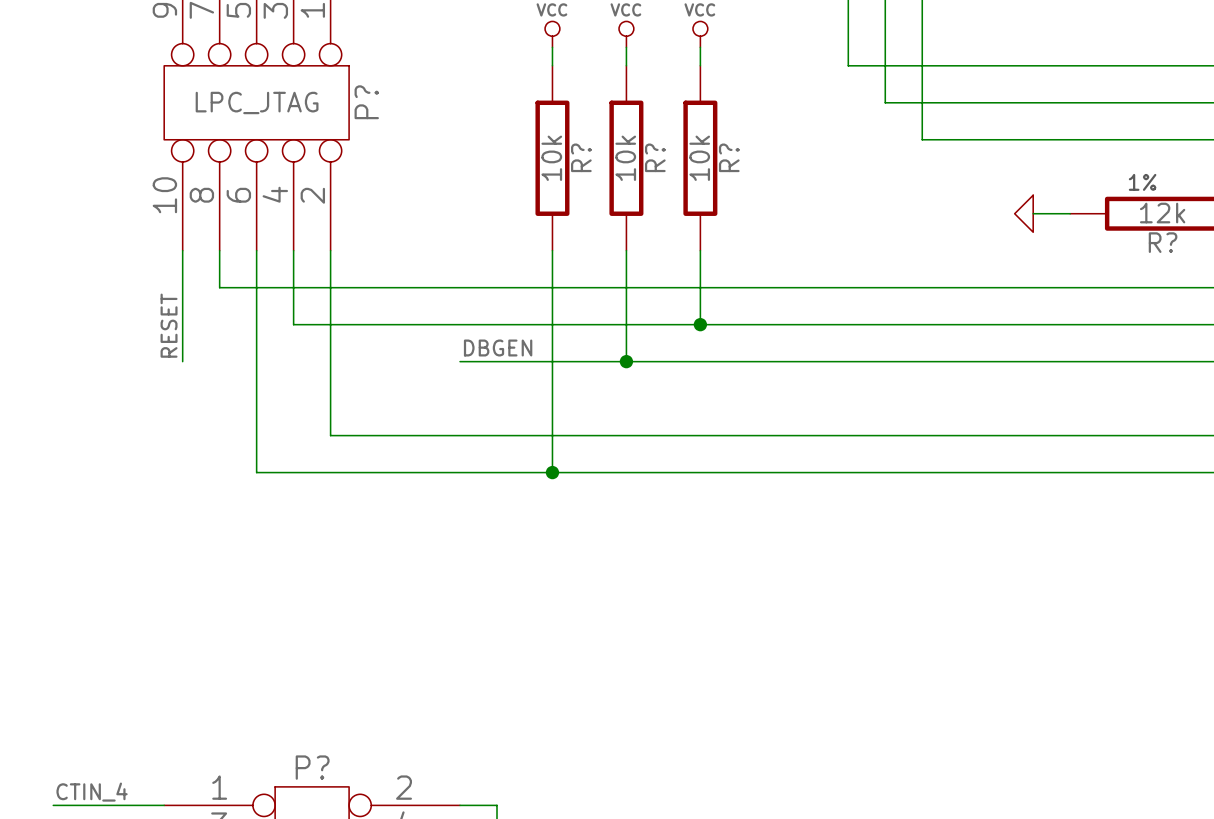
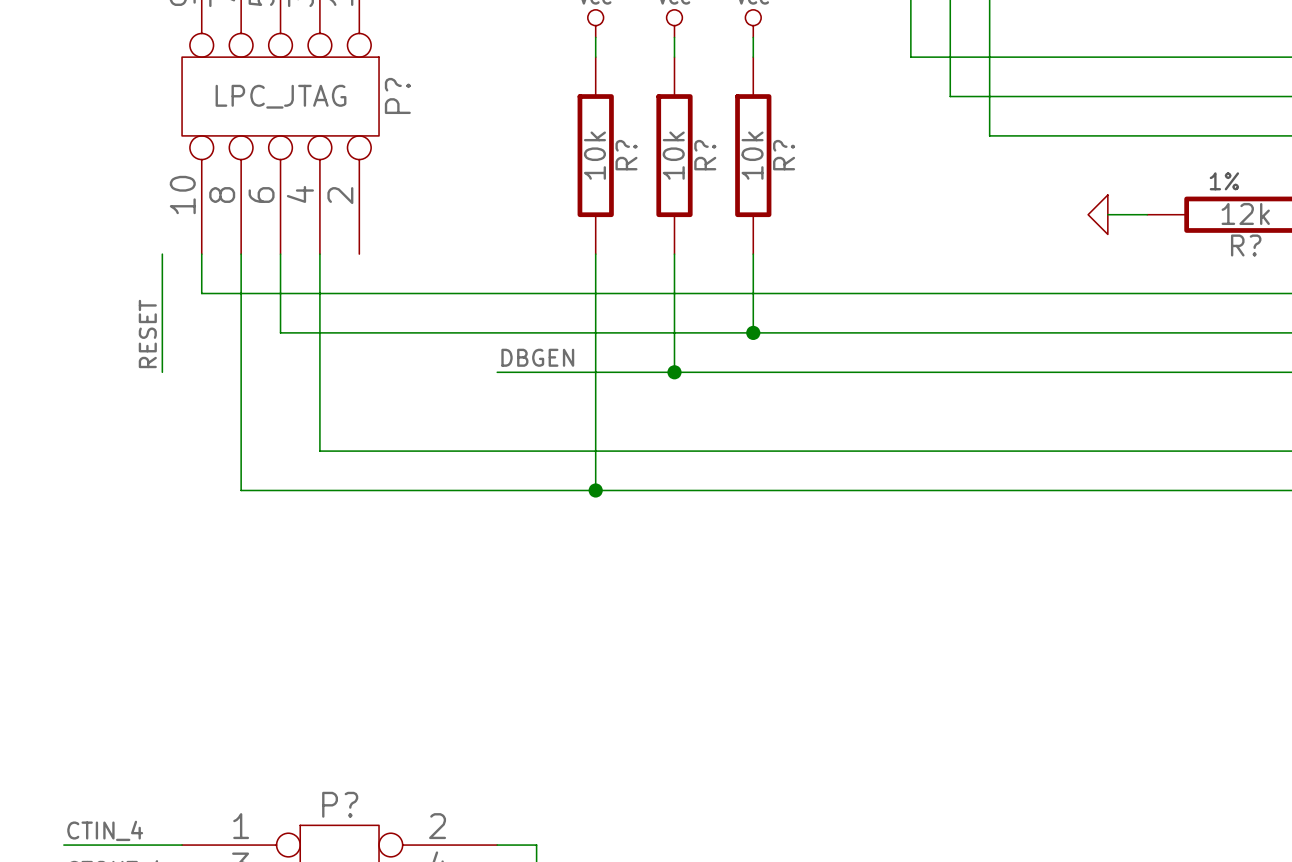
wire: none -> (162, 254) (162, 372)
wire: (330, 250) (330, 435) -> none
wire: (182, 287) (182, 361) -> (201, 293) (241, 293) (241, 490) (280, 490)
wire: (256, 324) (256, 472) -> (280, 332) (319, 332) (319, 451) (359, 451)
label position: RESET (169, 325) -> RESET (147, 333)

